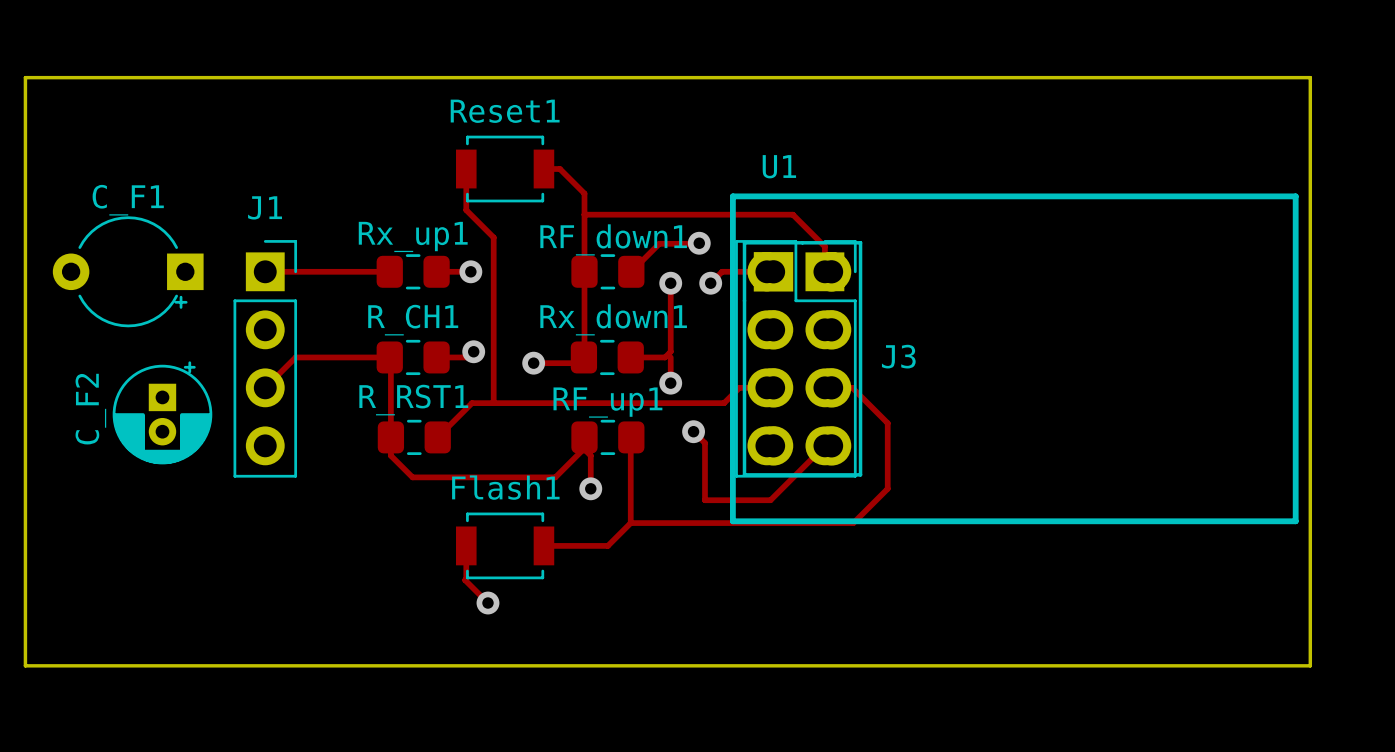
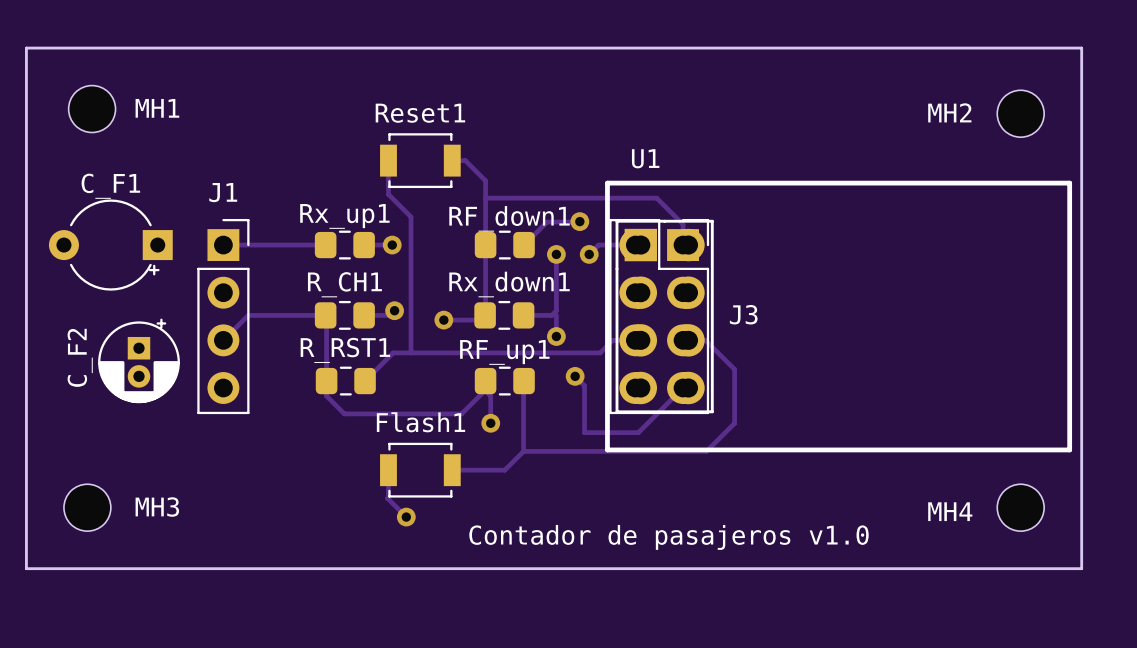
board edge: (25, 77) (1310, 77) -> (26, 85) (26, 48) (1081, 48) (1081, 85)
MH1: none -> (92, 109)
MH2: none -> (1020, 113)
MH3: none -> (87, 507)
MH4: none -> (1020, 507)
text: none -> Contador de pasajeros v1.0 (668, 537)

